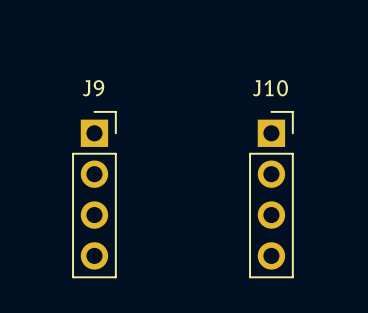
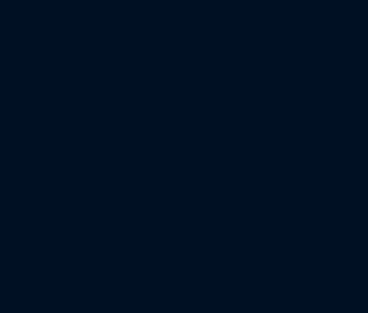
J9: (94, 194) -> none
J10: (271, 194) -> none

